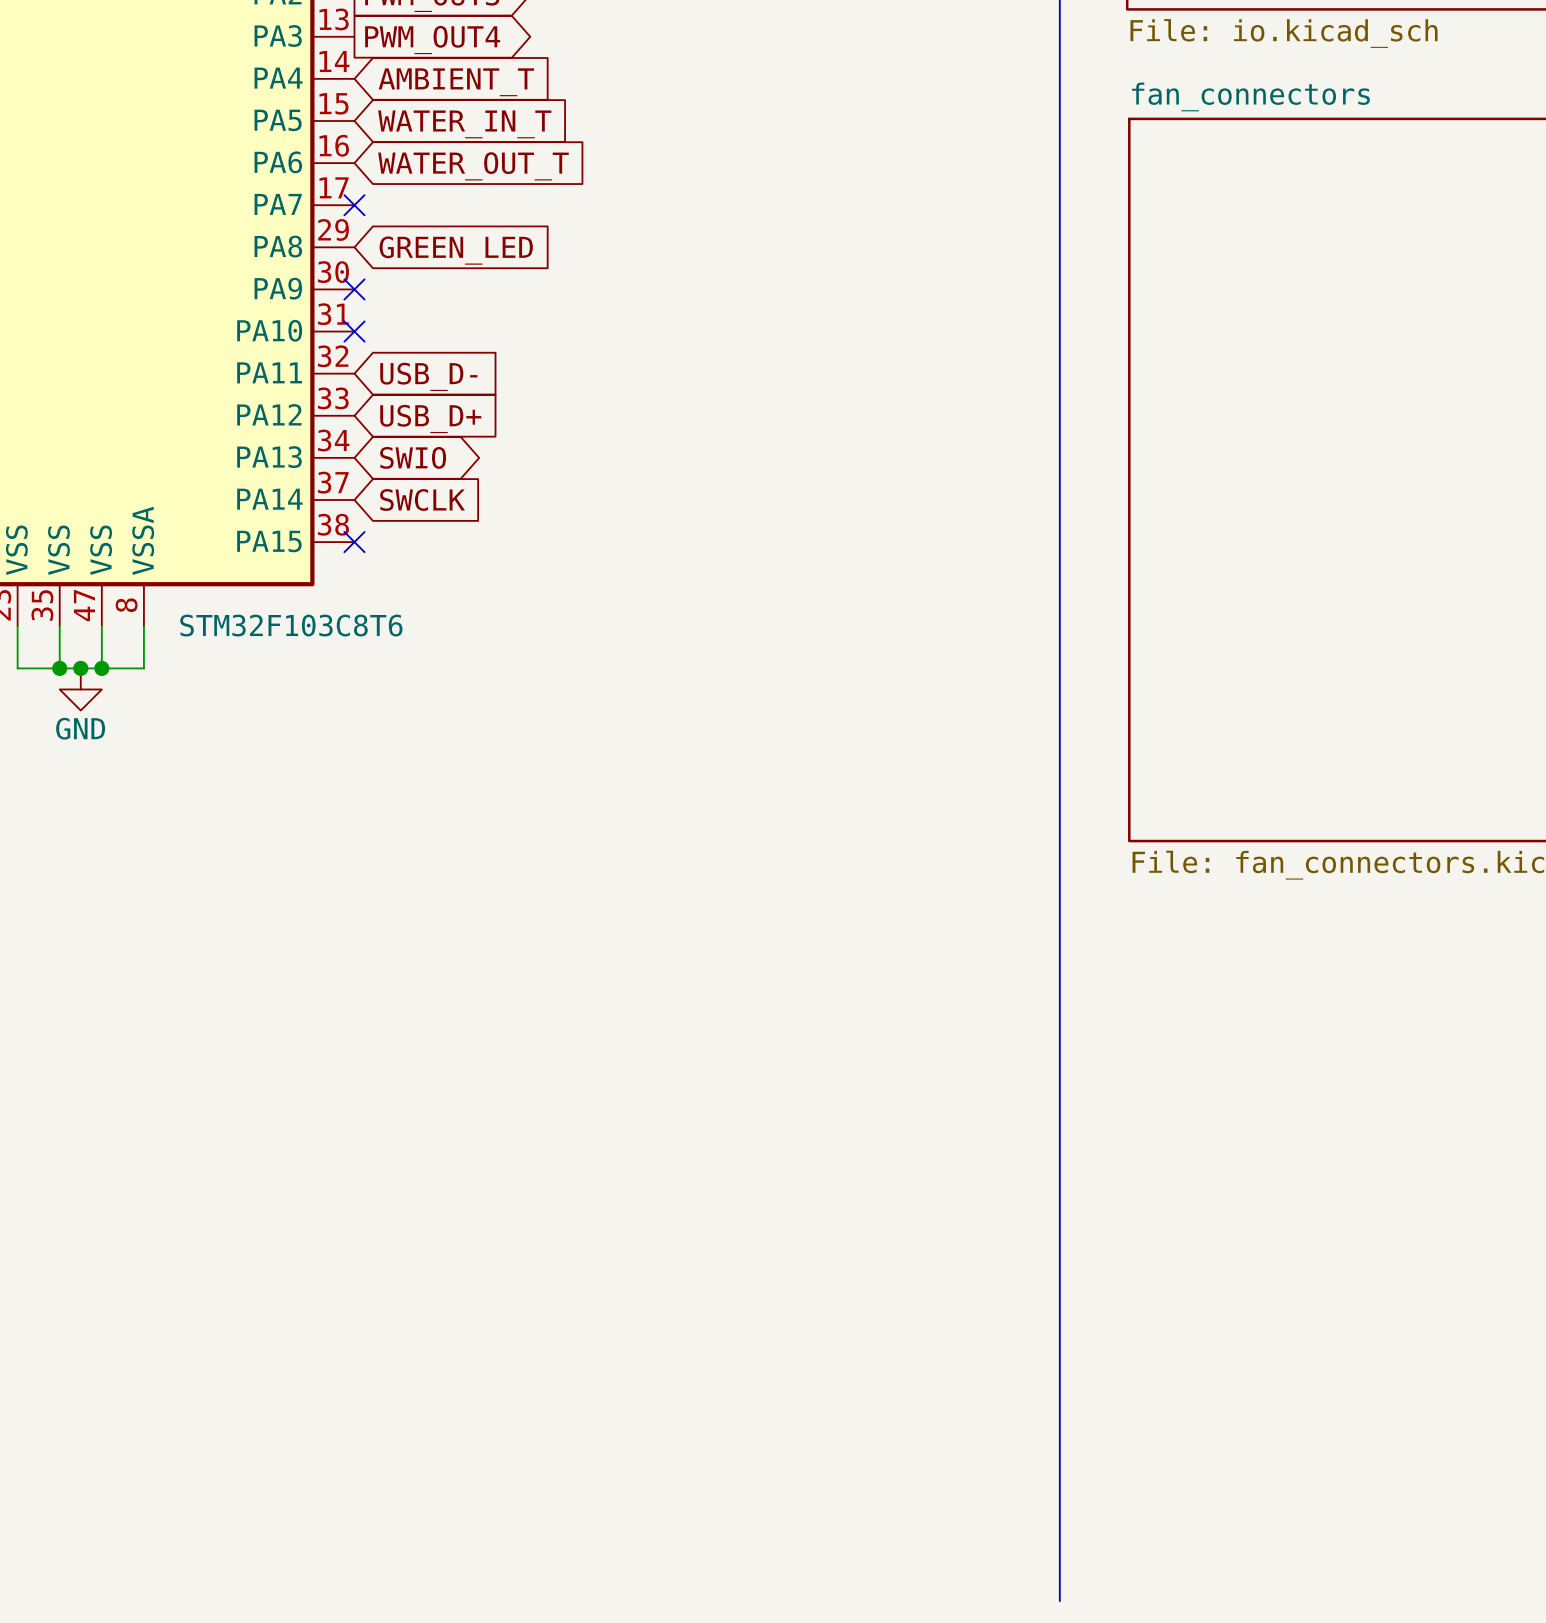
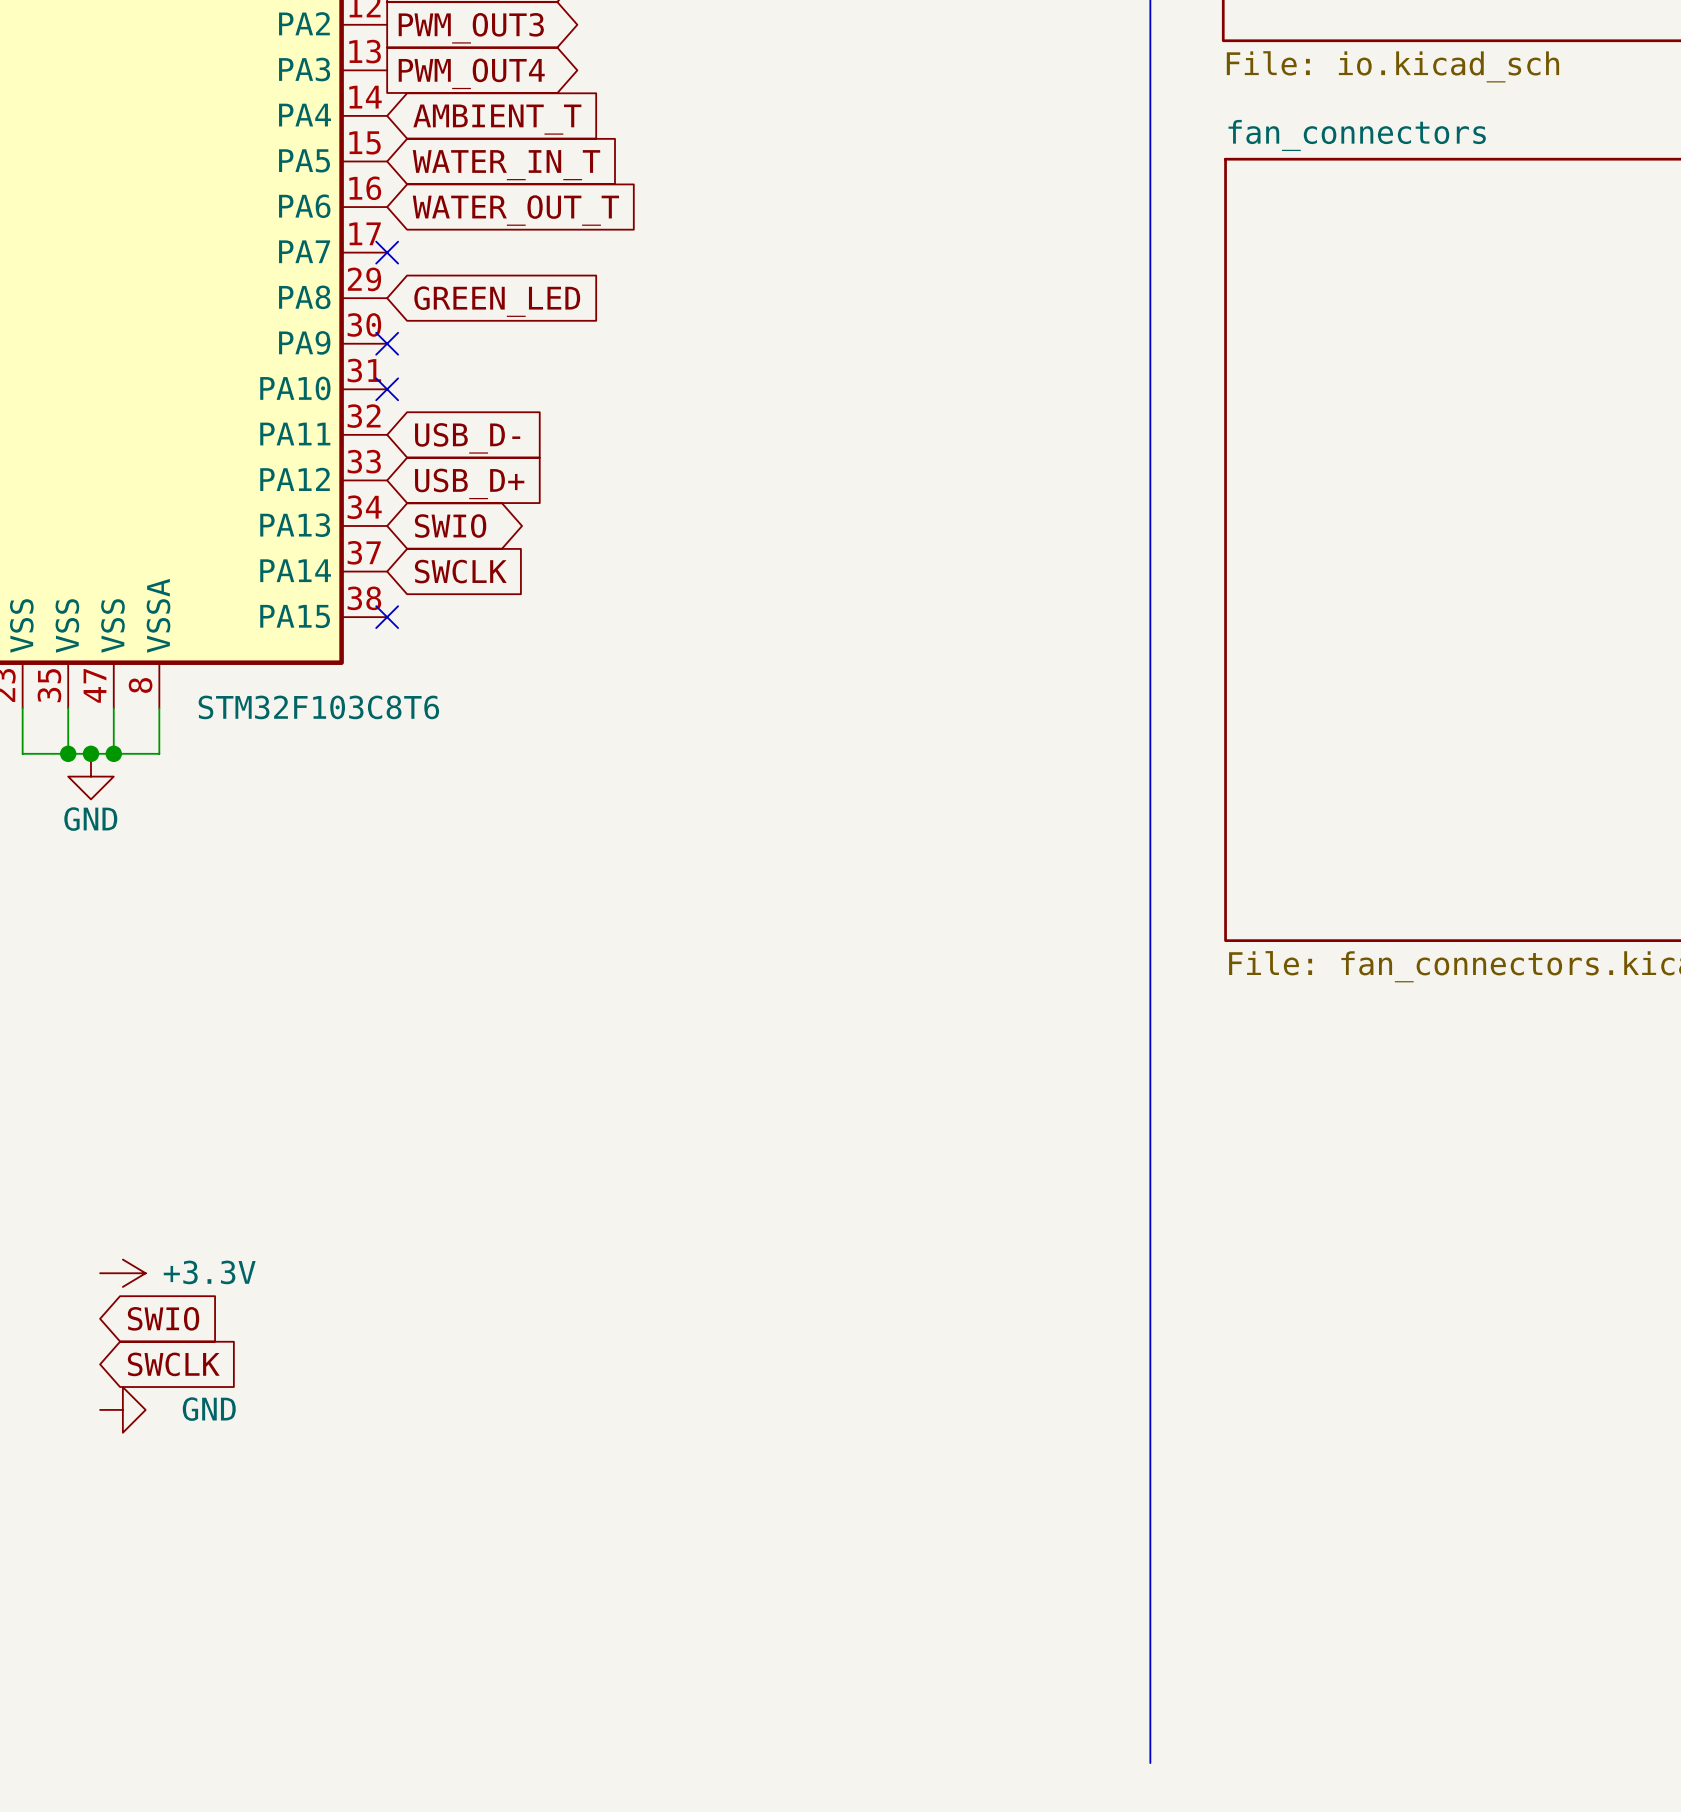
power symbol: none -> +3.3V (122, 1273)
global label: none -> SWIO (163, 1318)
global label: none -> SWCLK (173, 1364)
power symbol: none -> GND (122, 1409)

